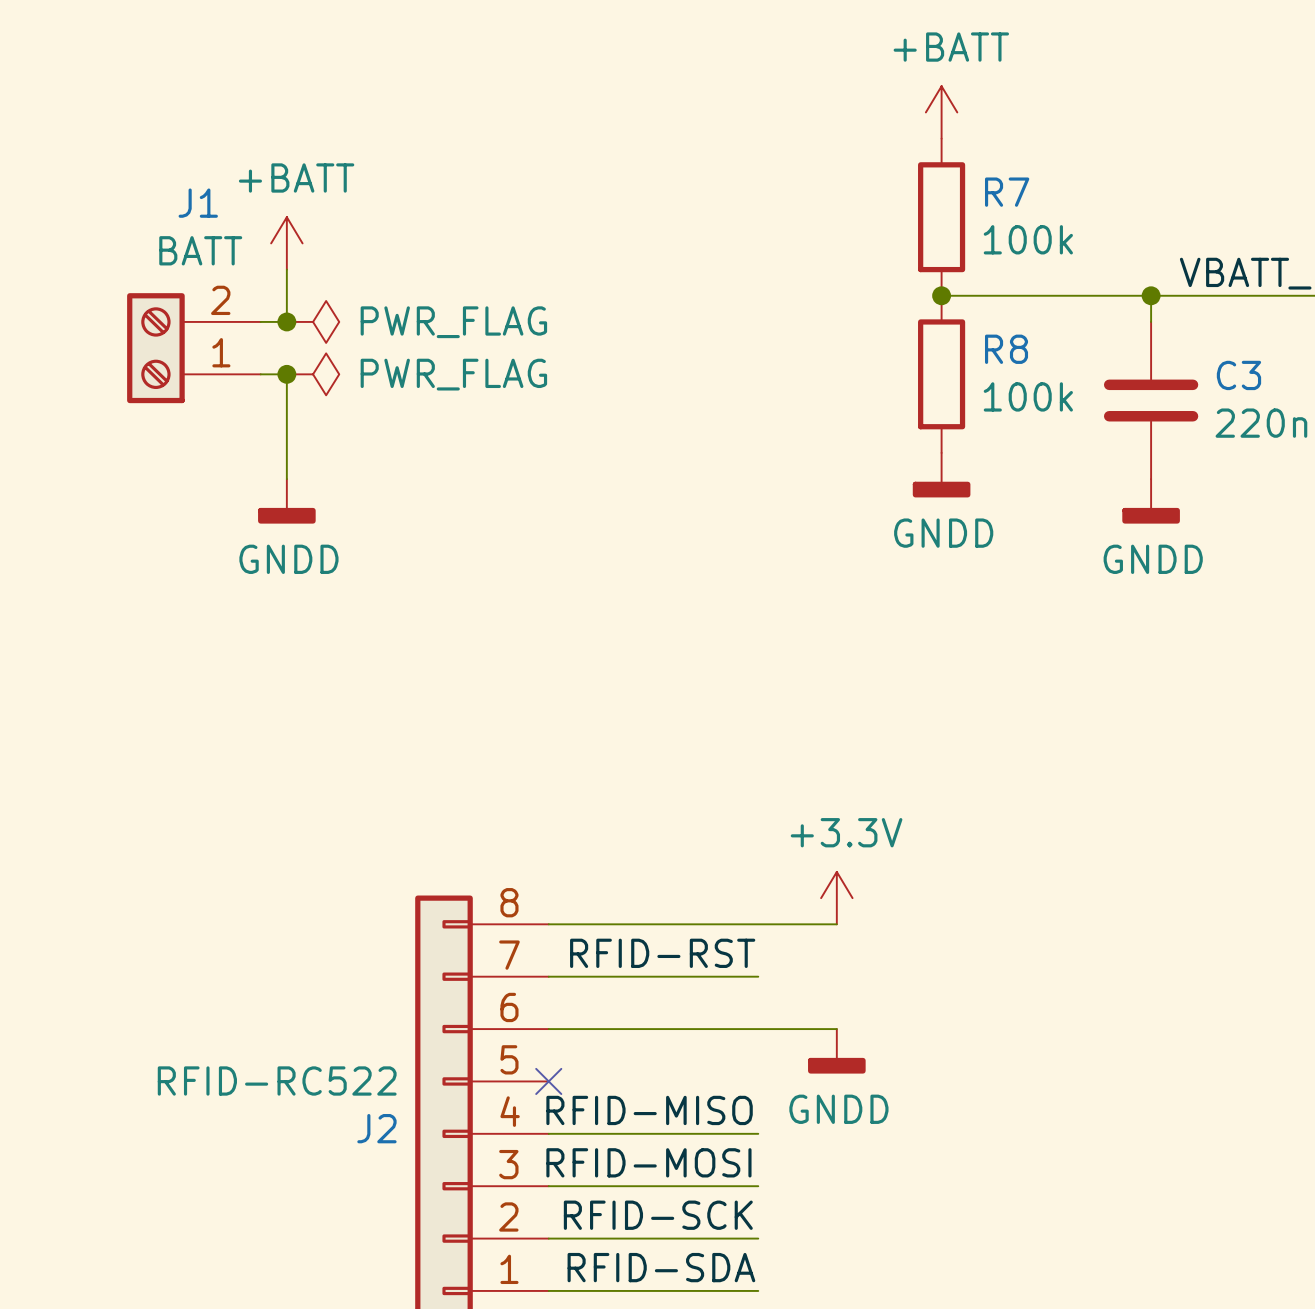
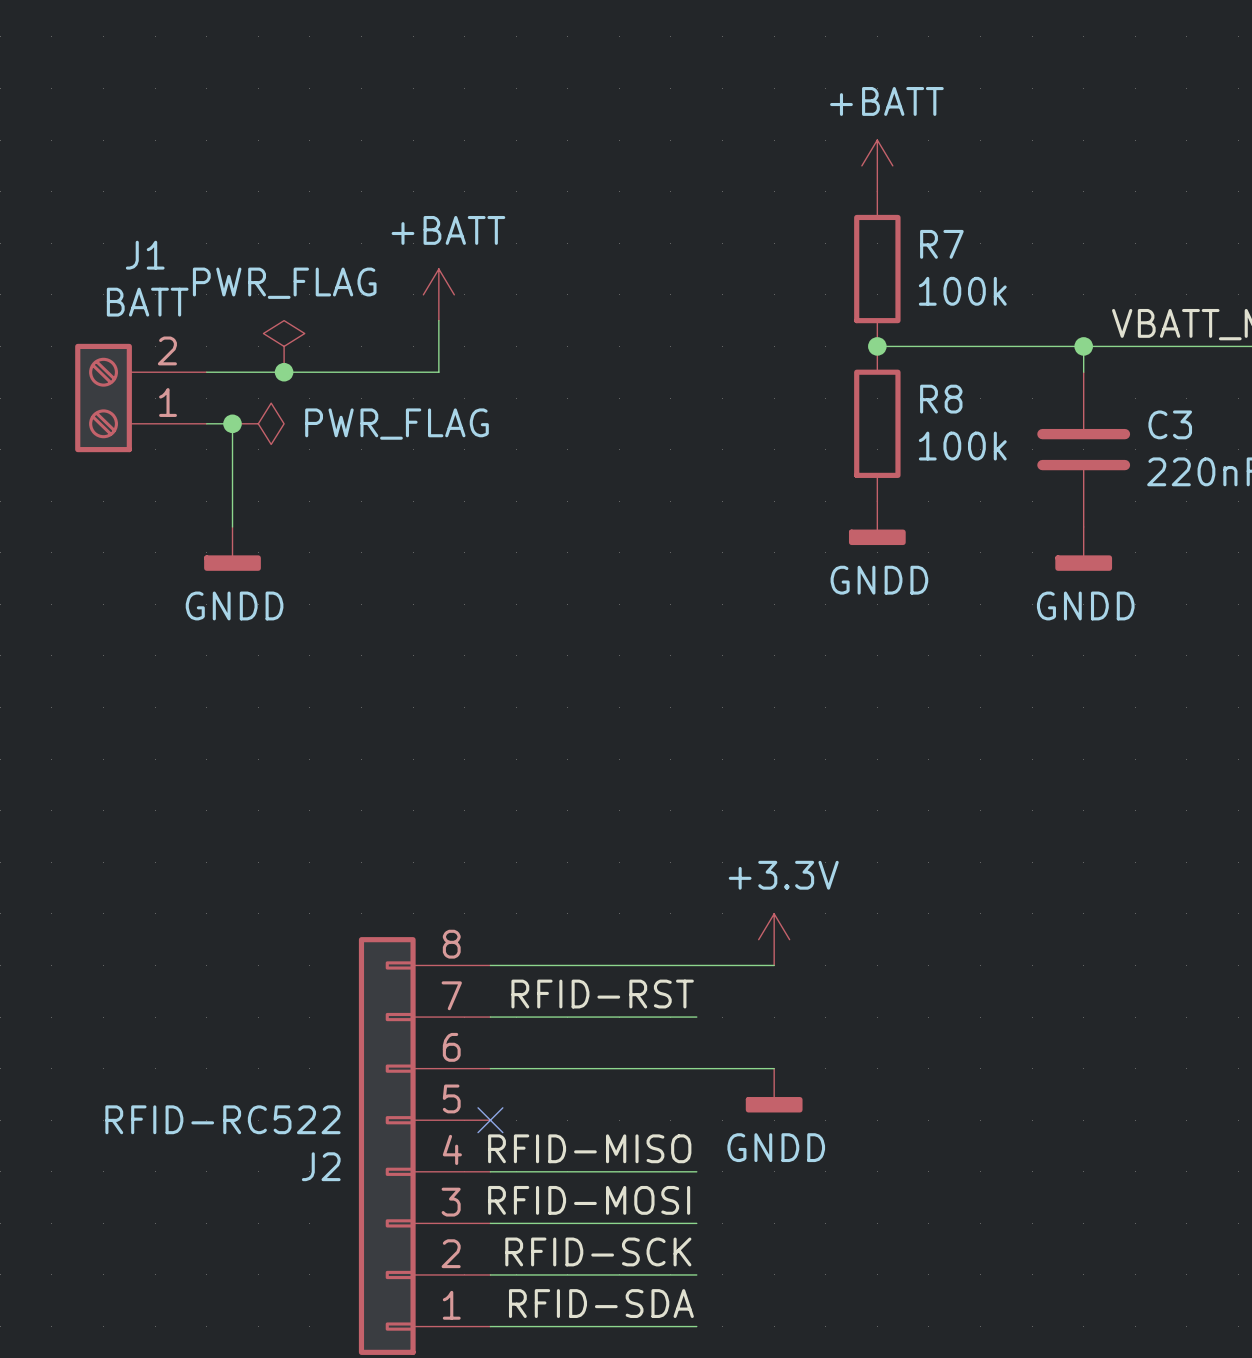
power symbol position: +BATT (286, 243) -> +BATT (438, 294)
wire: (286, 269) (286, 321) -> (438, 320) (438, 372) (232, 372)
junction position: (286, 321) -> (284, 372)
power symbol rotation: 0° (313, 321) -> 90° counterclockwise (284, 346)
power symbol position: PWR_FLAG (313, 321) -> PWR_FLAG (284, 346)
power symbol text position: PWR_FLAG (453, 322) -> PWR_FLAG (284, 283)

